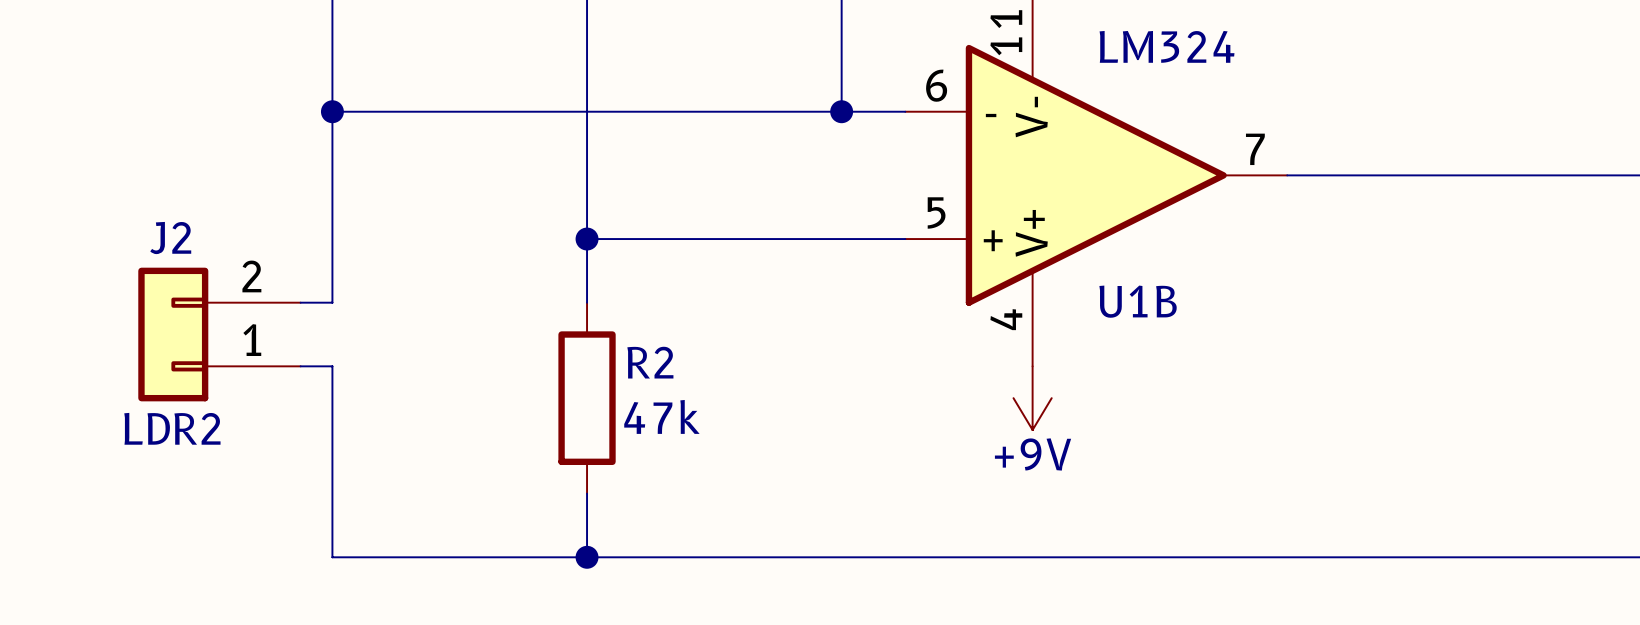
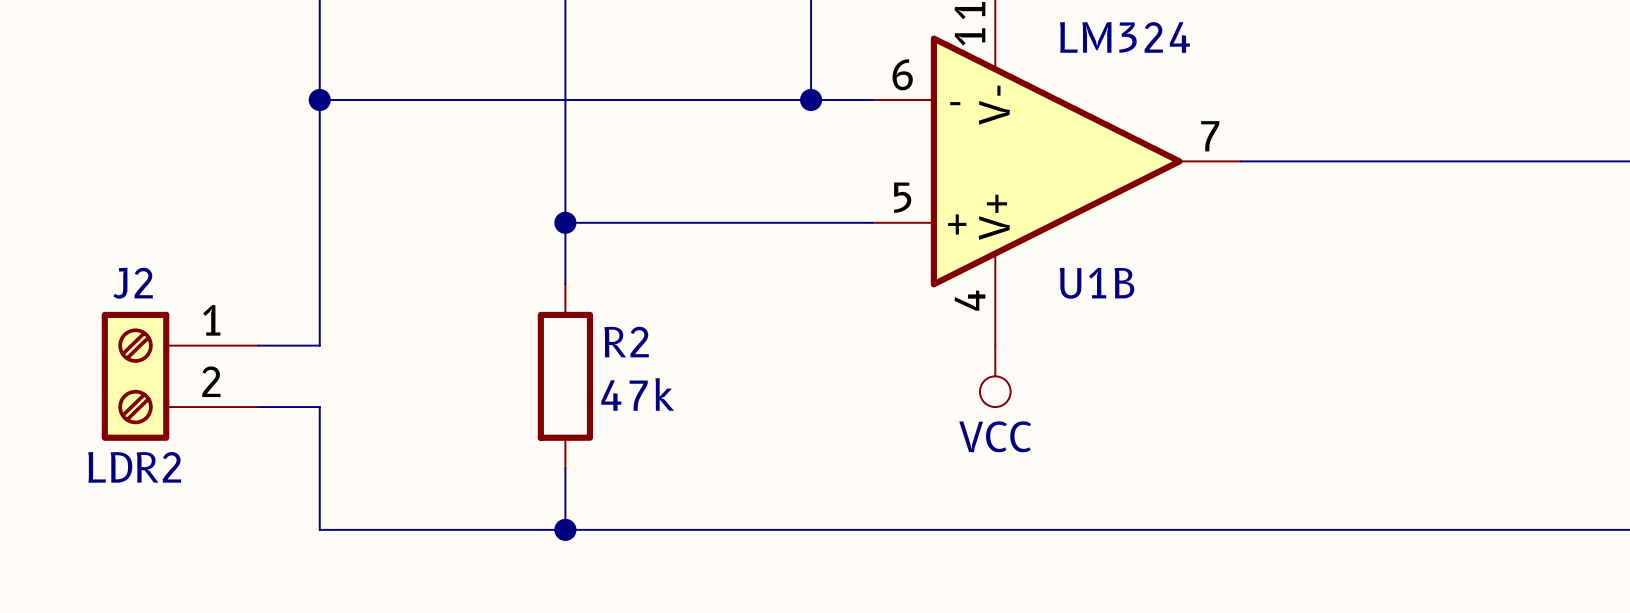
J2 symbol: [138, 267, 301, 402] -> [101, 311, 259, 441]
wire: (300, 302) (332, 302) -> (319, 345) (319, 284)
wire: (332, 366) (332, 429) -> (258, 407) (319, 407)
power symbol: +9V (1032, 398) -> VCC (995, 376)

